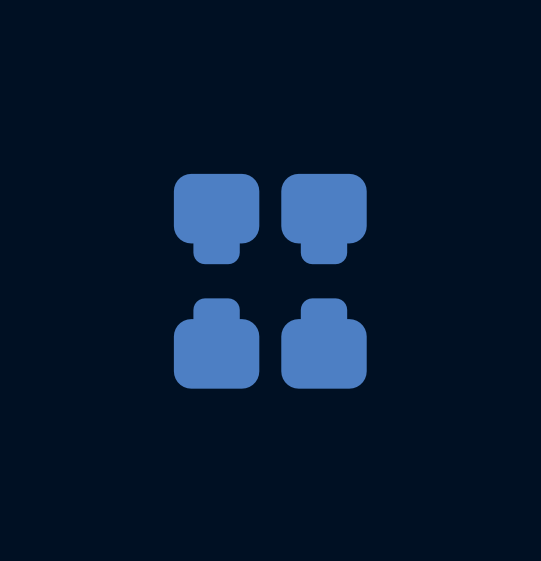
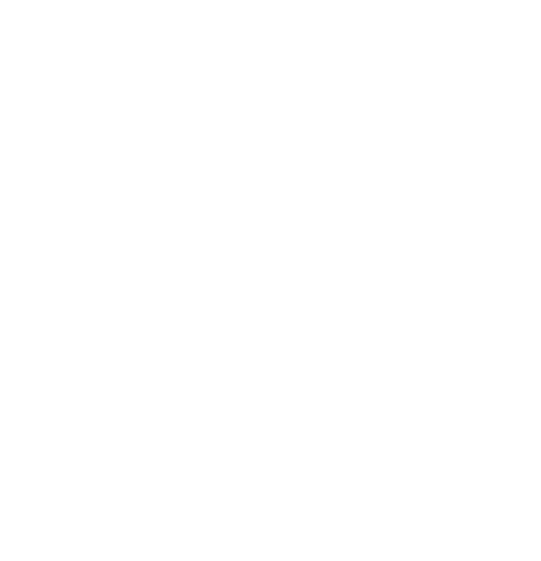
part: (216, 281) -> none
part: (323, 281) -> none

